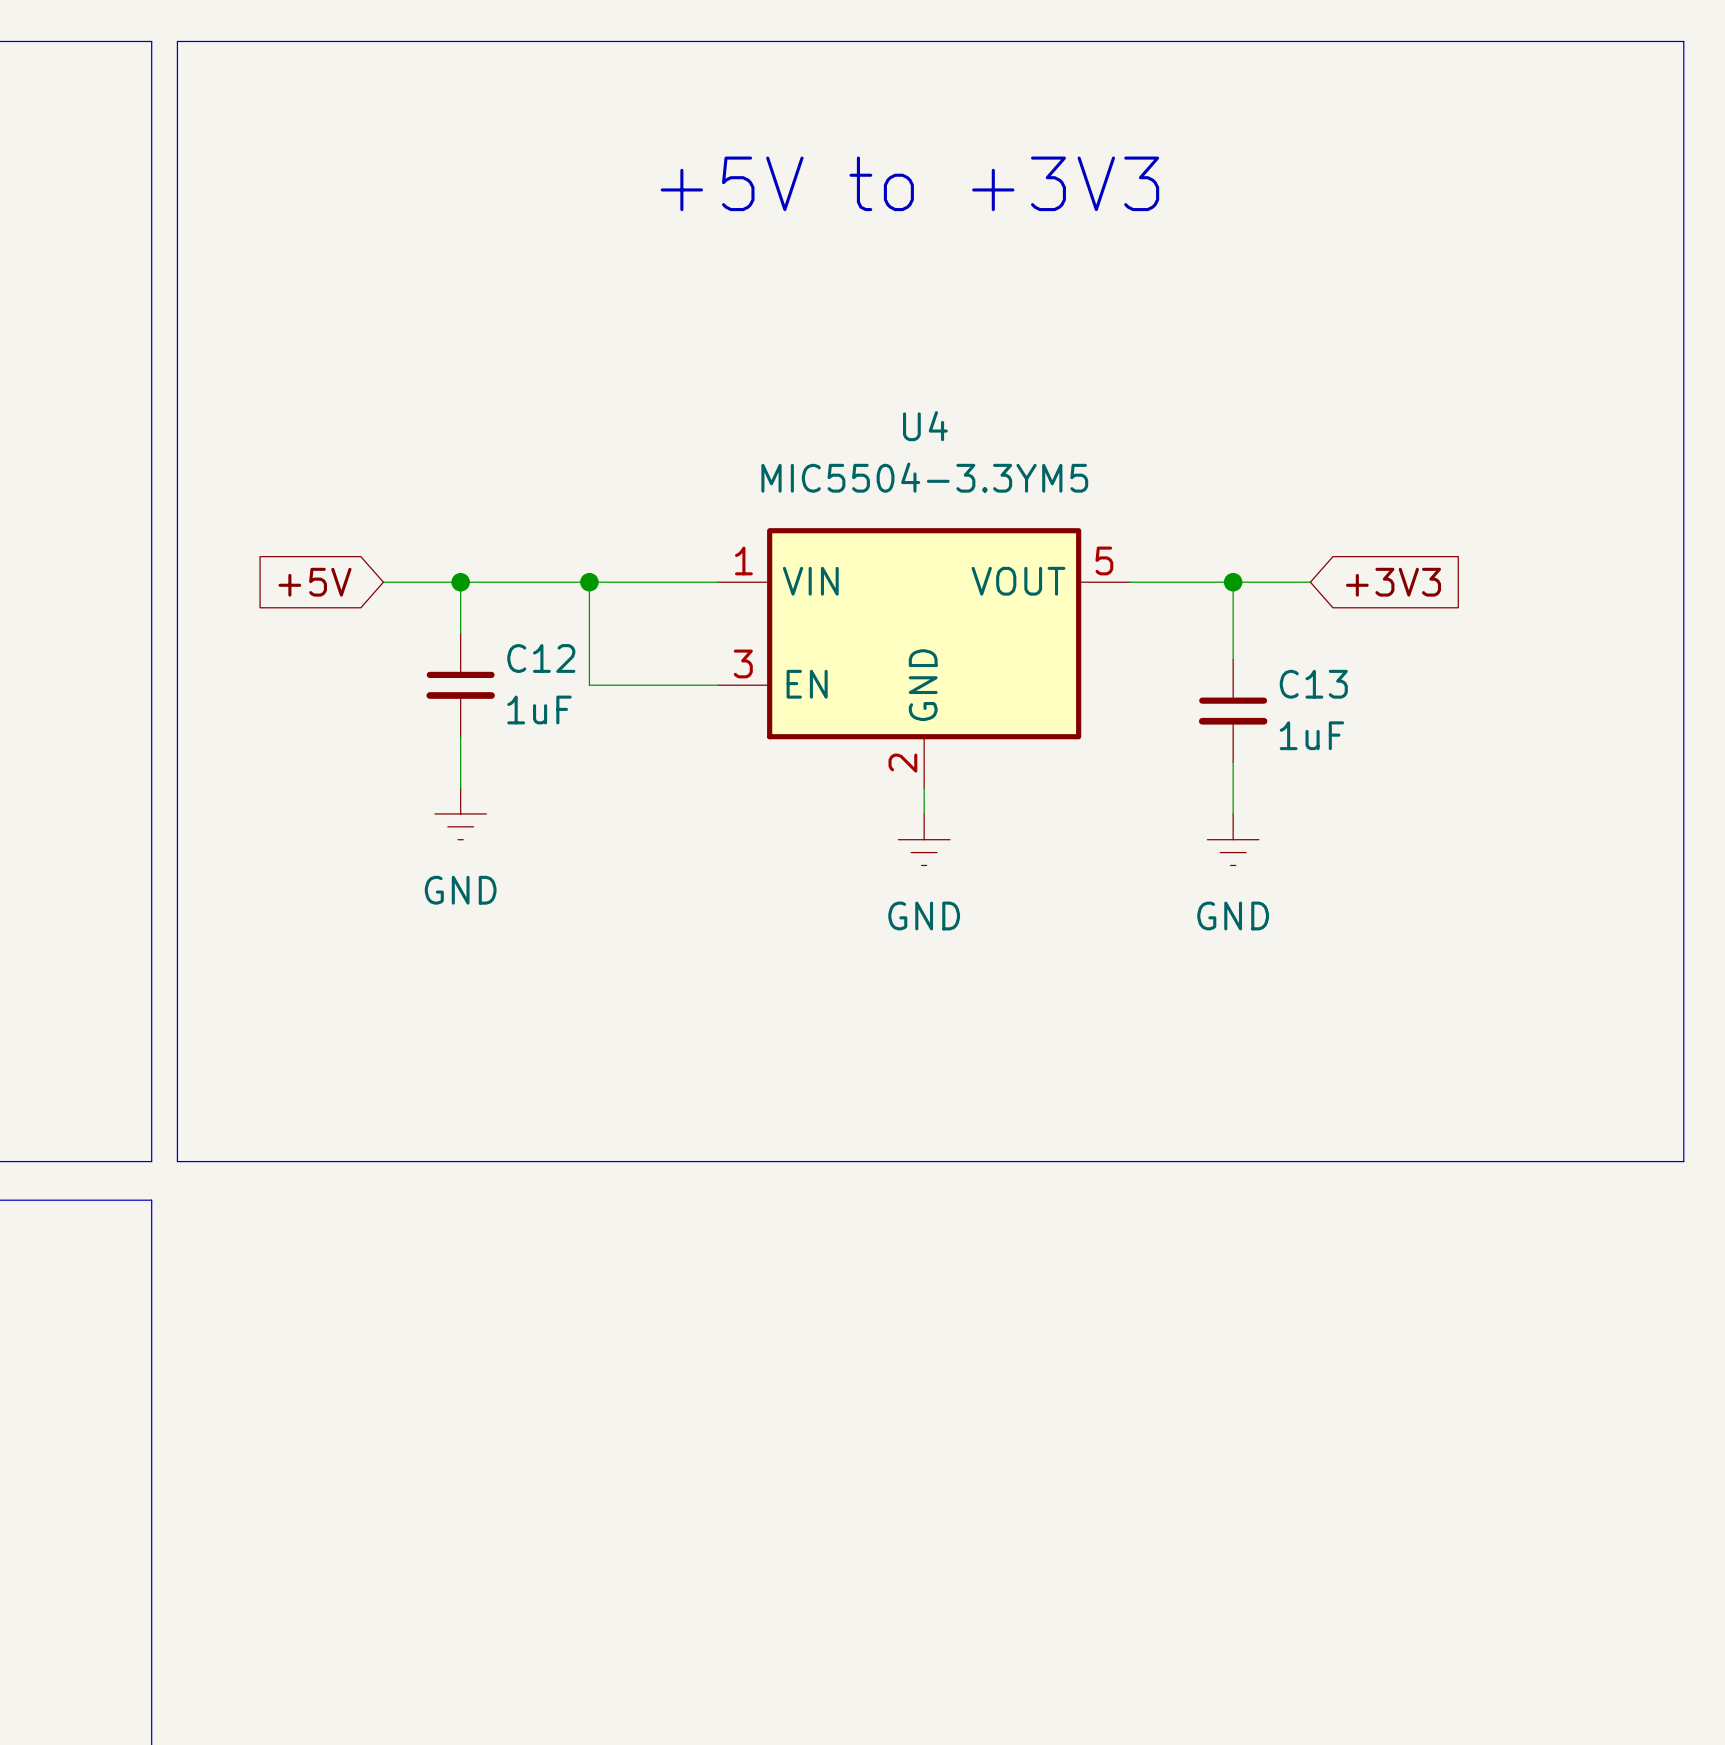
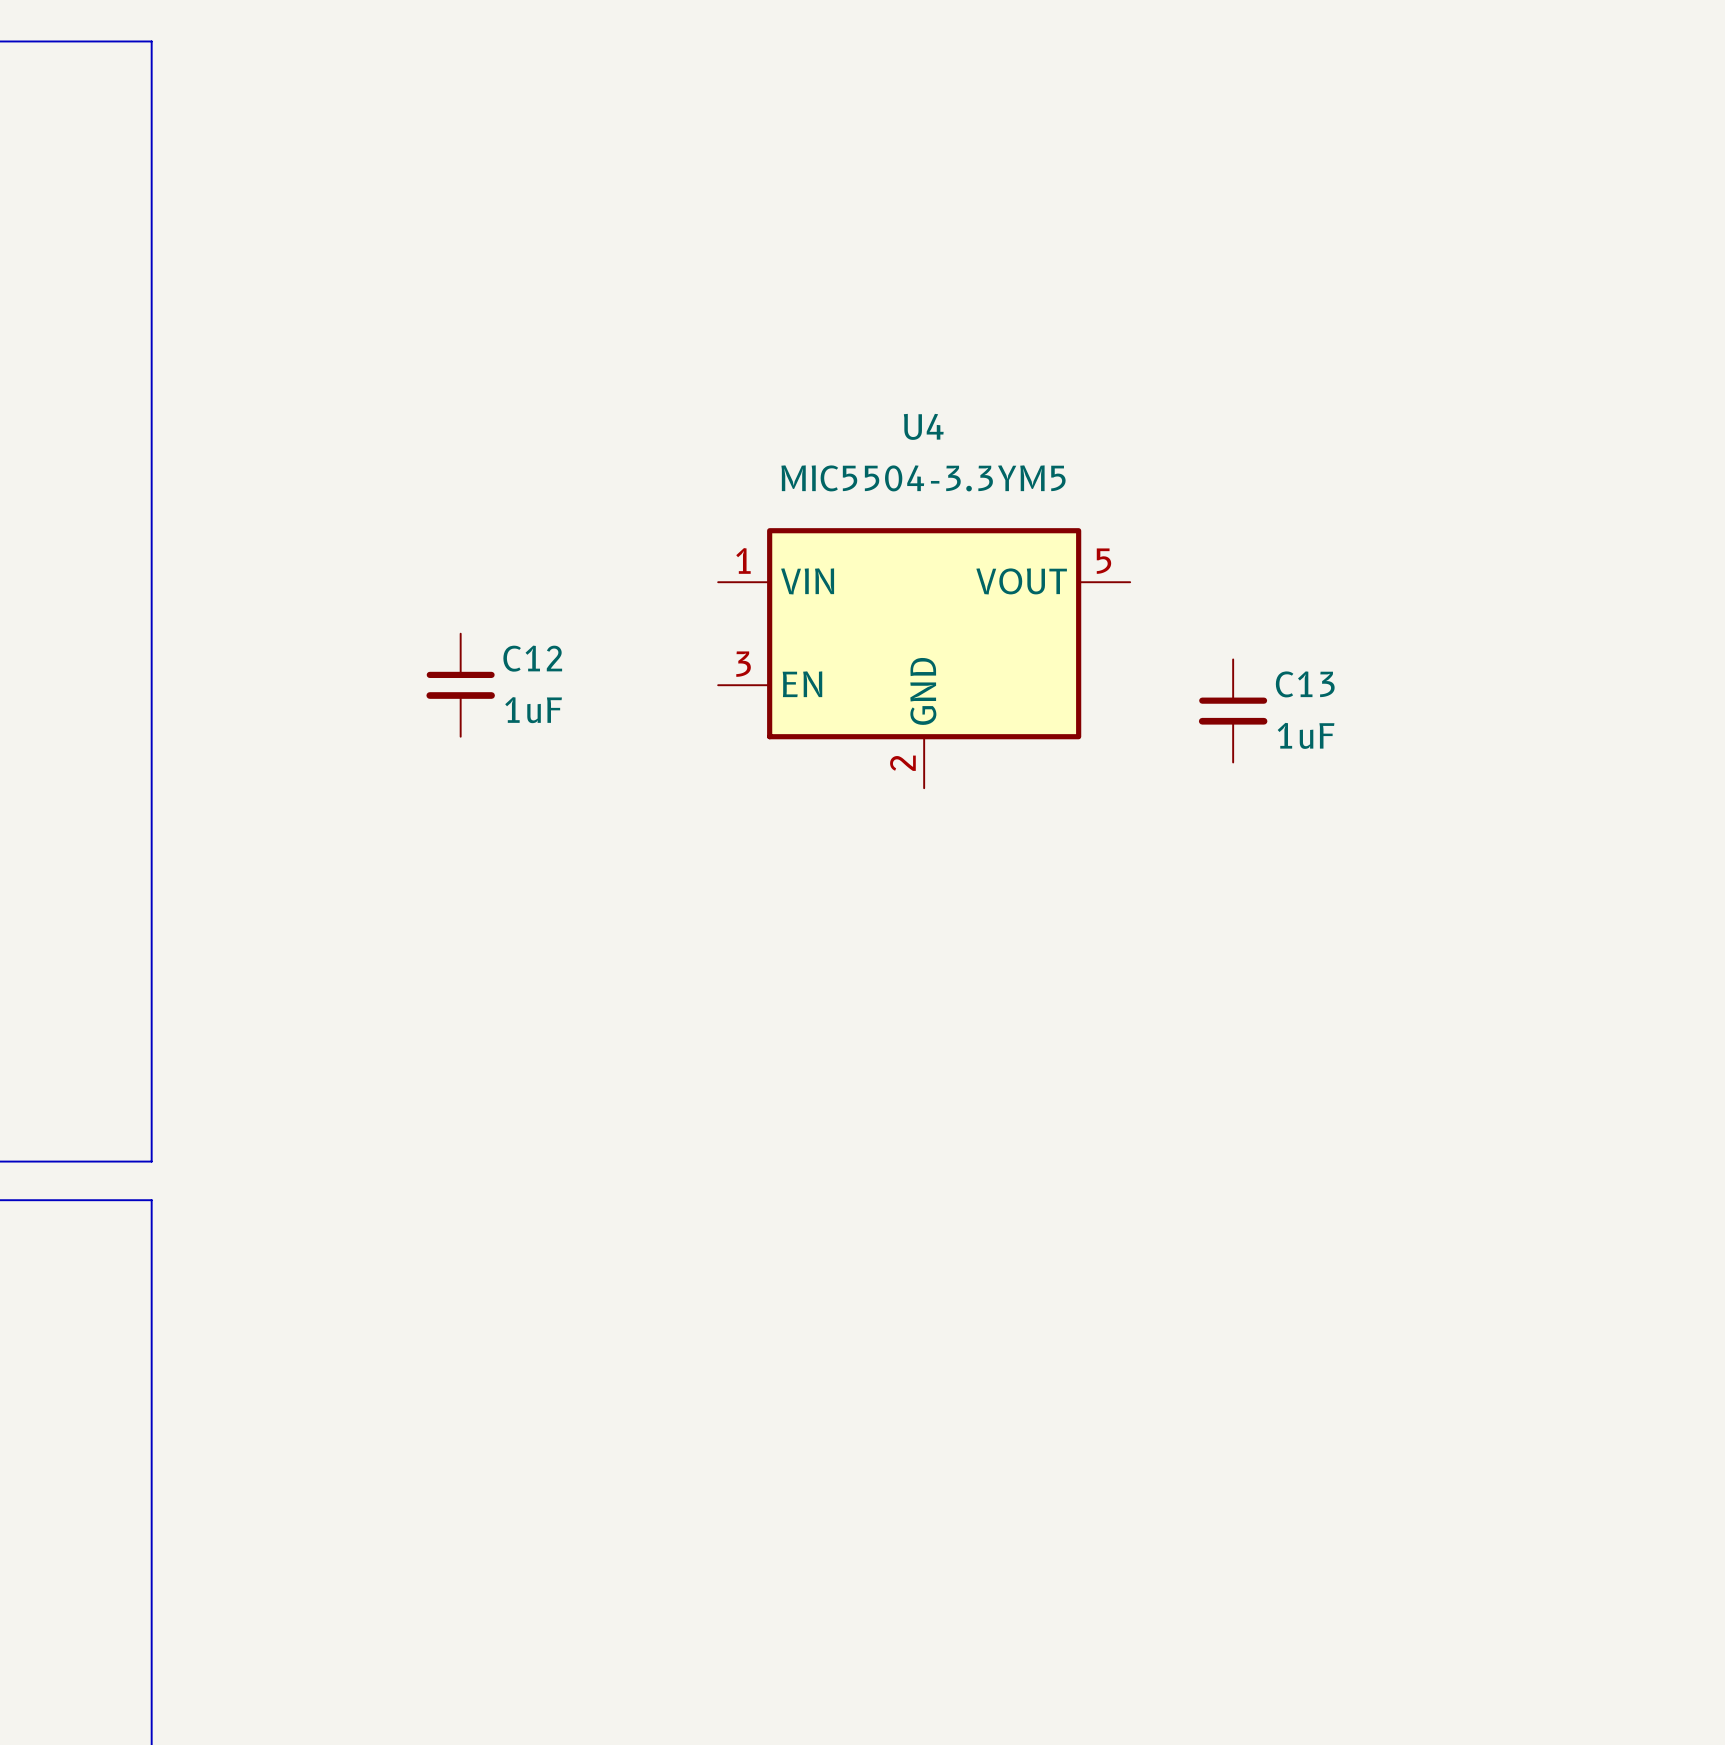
line: (177, 41) (1683, 41) (1683, 1161) (177, 1161) (177, 41) -> none
text: +5V to +3V3 (909, 183) -> none
global label: +5V (315, 582) -> none
wire: (383, 582) (718, 582) -> none
wire: (460, 582) (460, 633) -> none
junction: (460, 582) -> none
wire: (589, 582) (589, 685) (718, 685) -> none
junction: (589, 582) -> none
wire: (1130, 582) (1310, 582) -> none
wire: (1233, 582) (1233, 659) -> none
junction: (1233, 582) -> none
global label: +3V3 (1393, 582) -> none
wire: (460, 736) (460, 788) -> none
wire: (1233, 762) (1233, 813) -> none
wire: (924, 788) (924, 813) -> none
power symbol: GND (460, 813) -> none
power symbol: GND (924, 839) -> none
power symbol: GND (1233, 839) -> none

